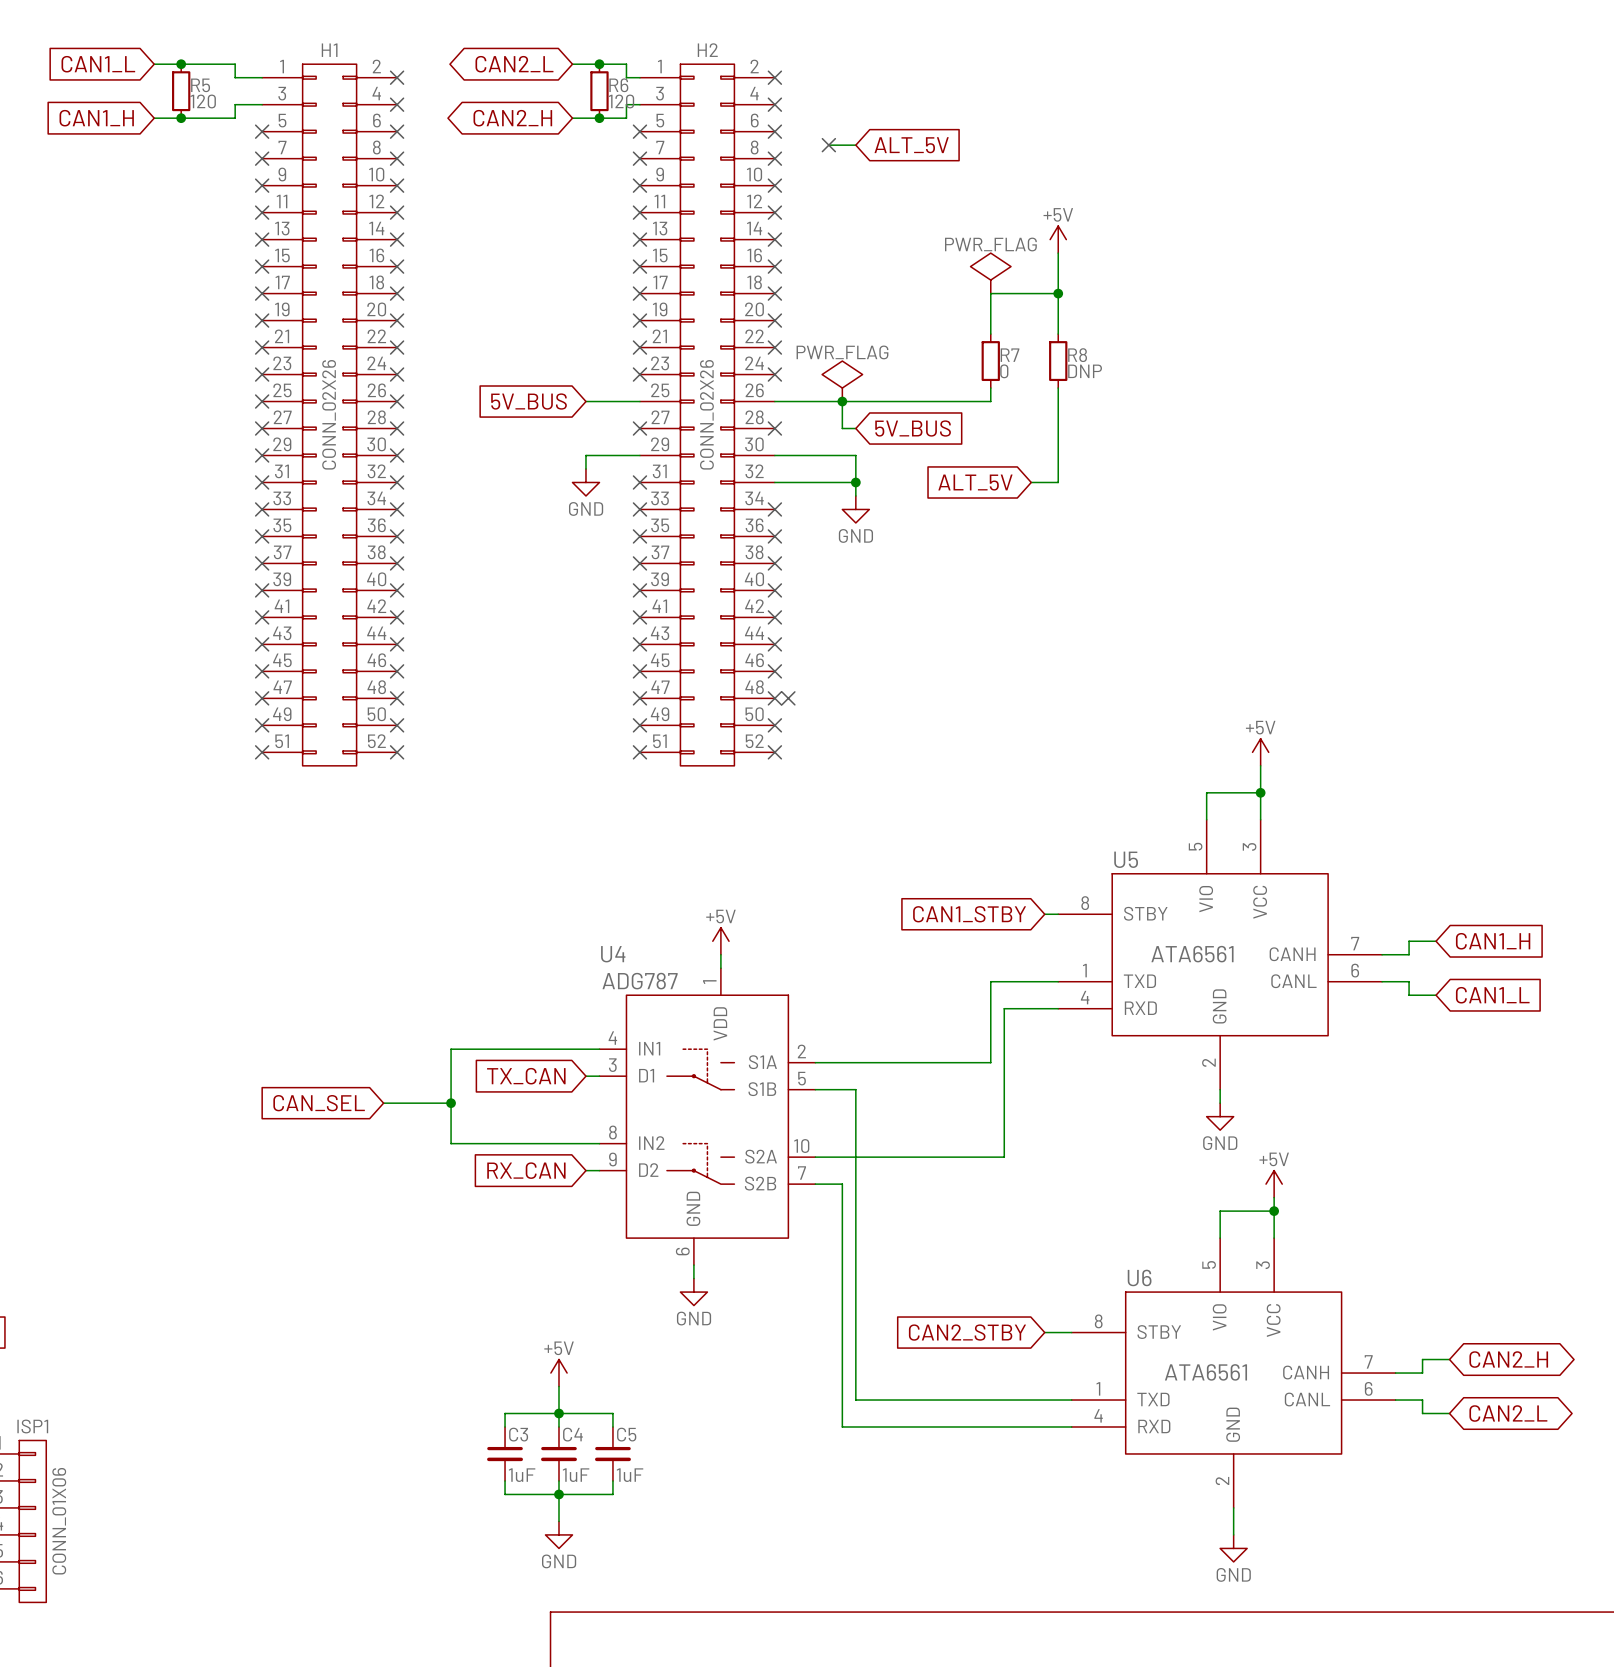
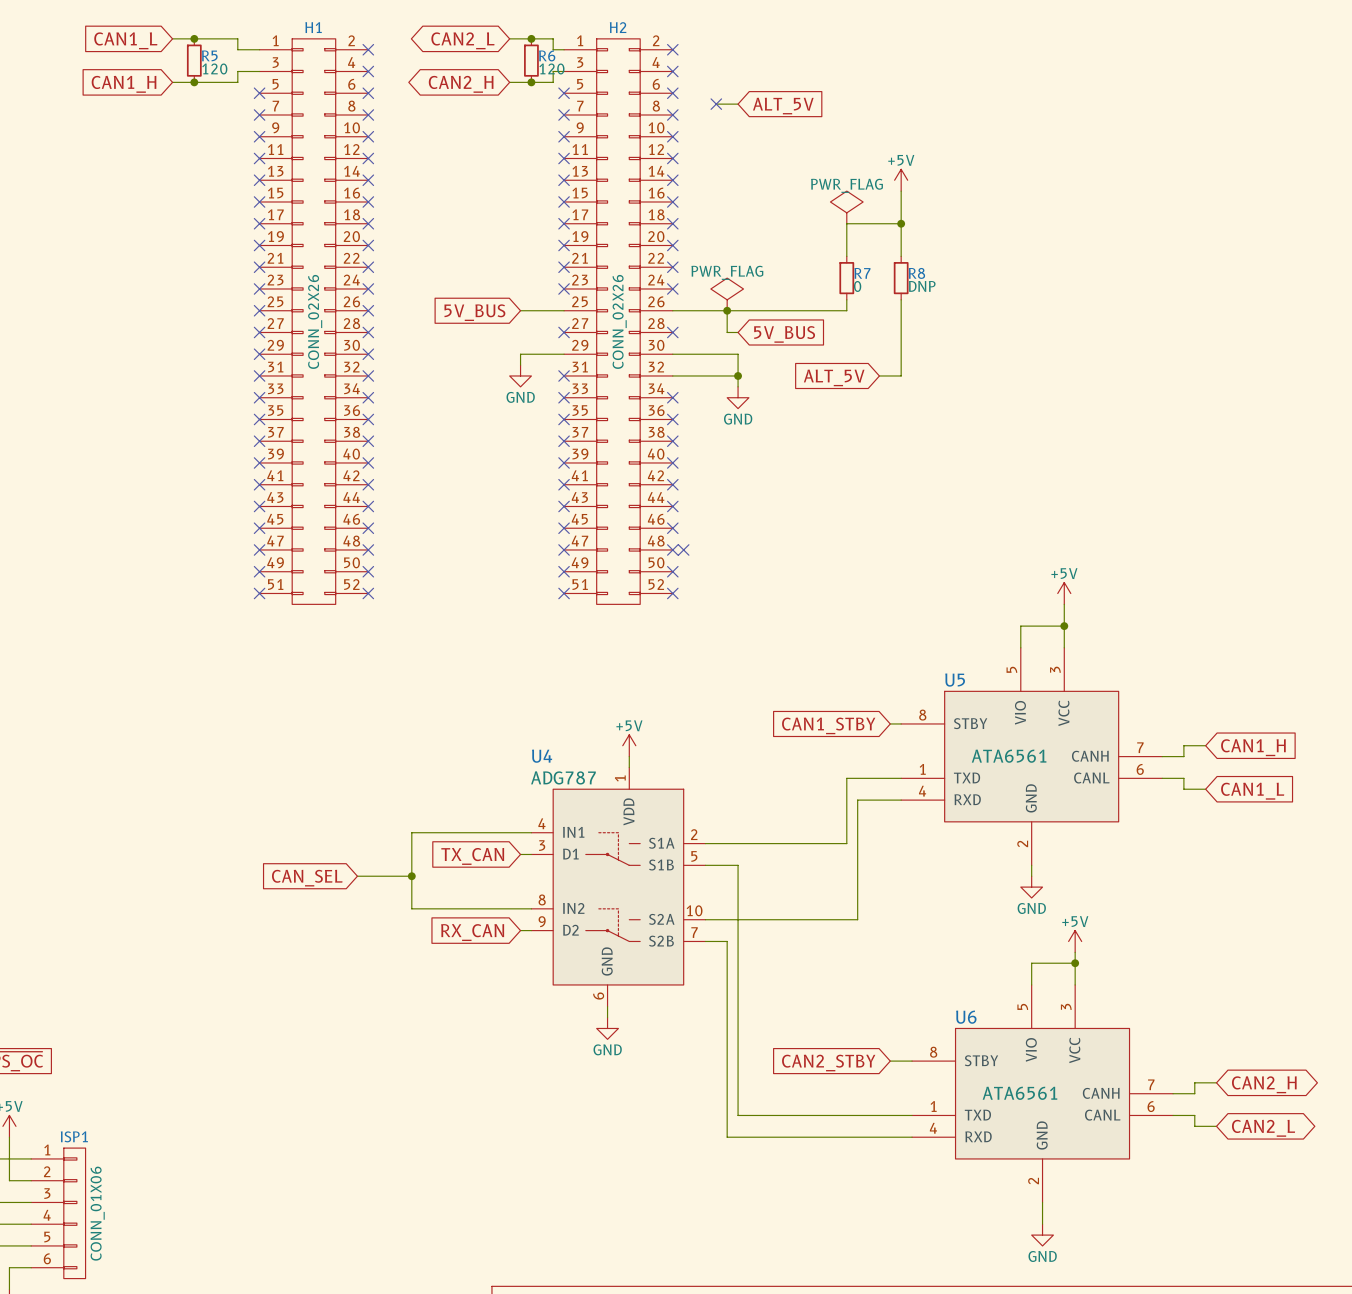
power symbol: +5V (558, 1373) -> none
wire: (558, 1386) (558, 1426) -> none
junction: (558, 1413) -> none
wire: (505, 1426) (505, 1413) (612, 1413) (612, 1426) -> none
C3: 1uF (505, 1453) -> none
C4: 1uF (558, 1453) -> none
C5: 1uF (612, 1453) -> none
wire: (505, 1480) (505, 1494) (612, 1494) (612, 1480) -> none
wire: (558, 1480) (558, 1521) -> none
junction: (558, 1494) -> none
power symbol: GND (558, 1534) -> none

